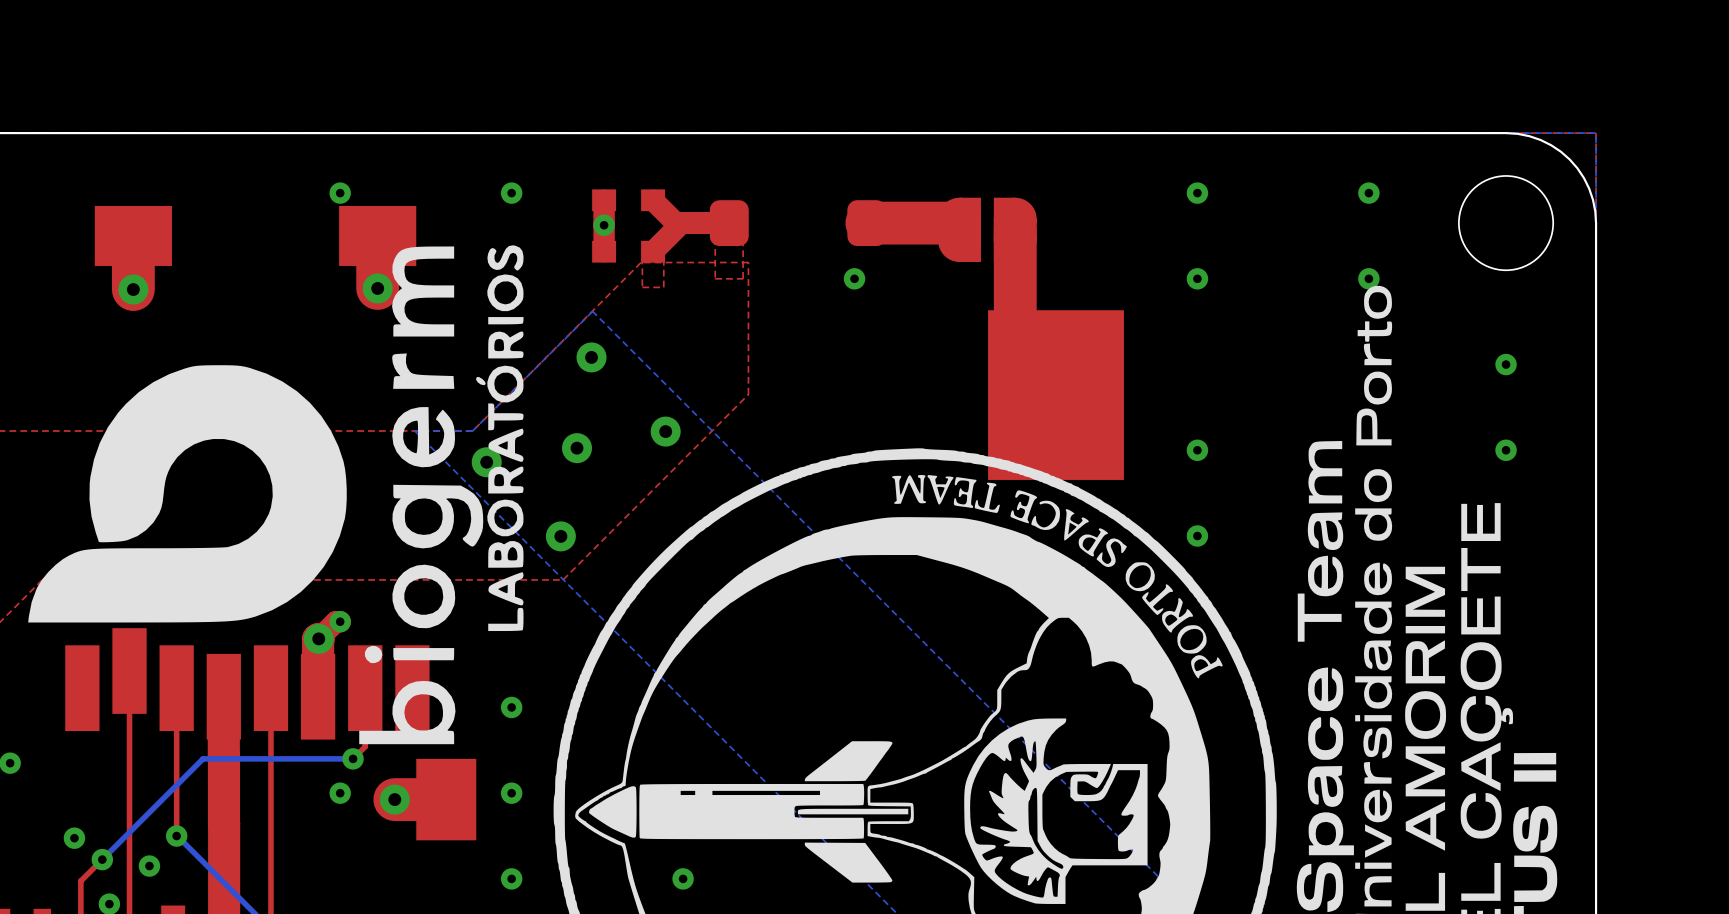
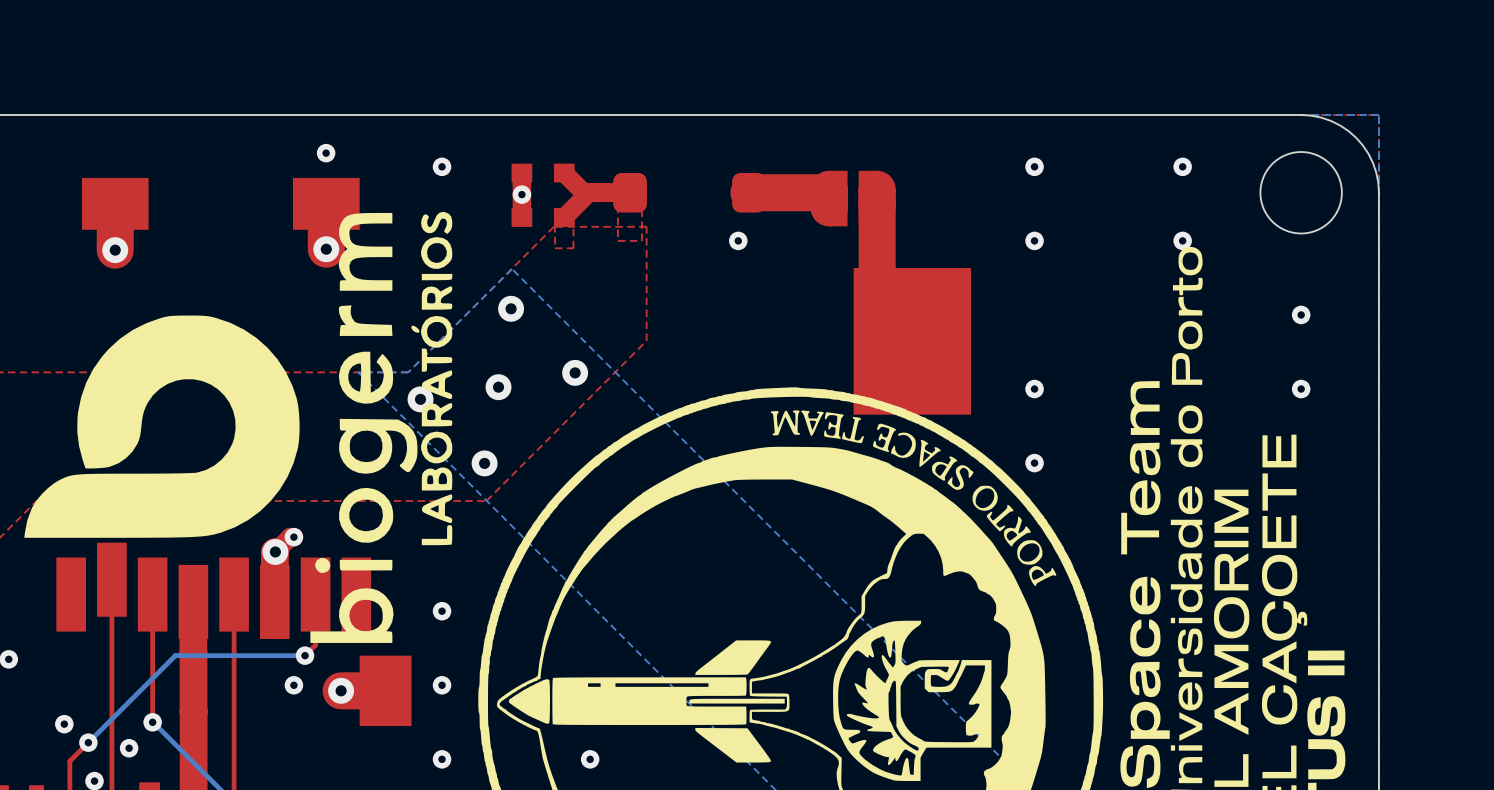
via position: (340, 193) -> (326, 153)

